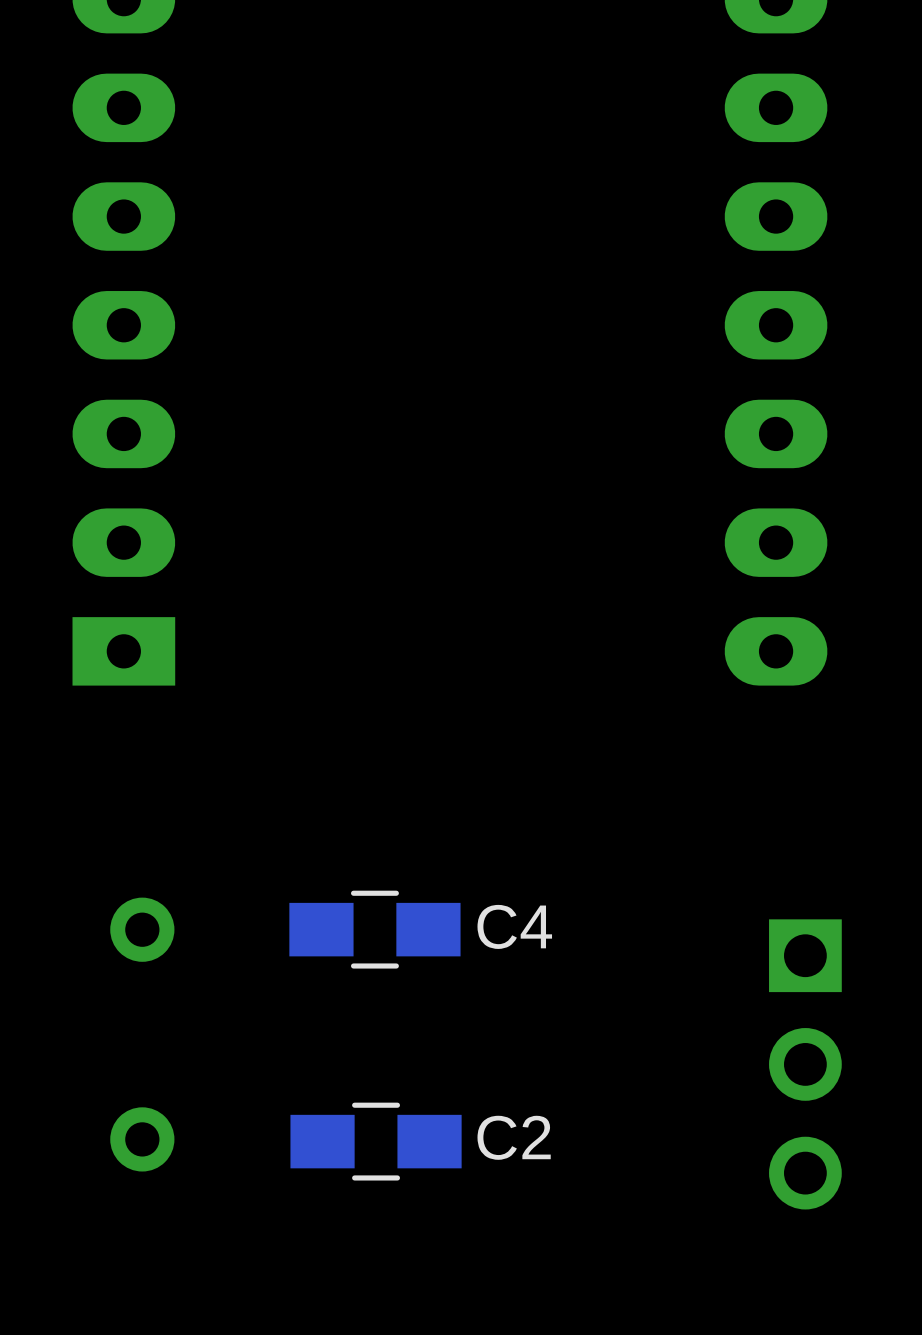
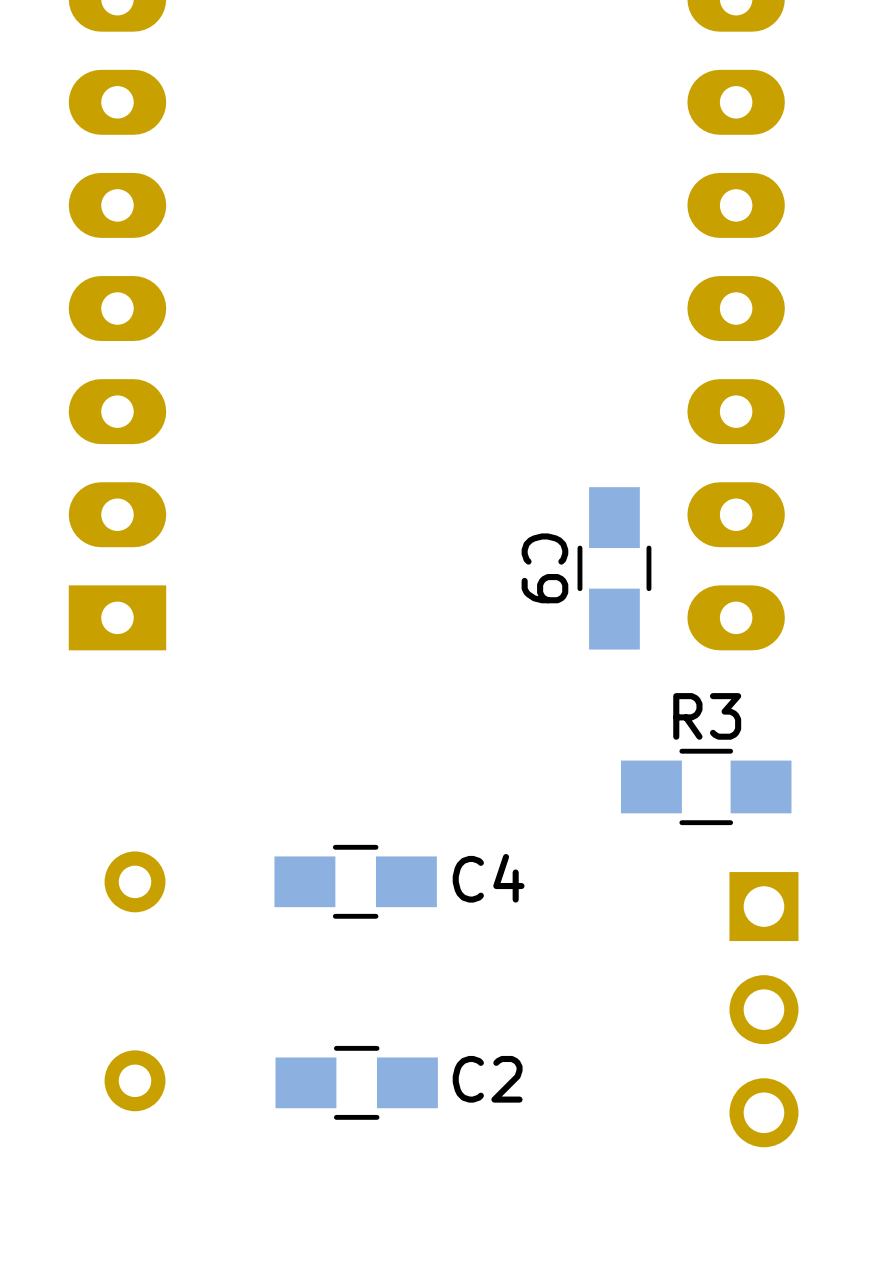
C9: none -> (614, 568)
R3: none -> (706, 786)

